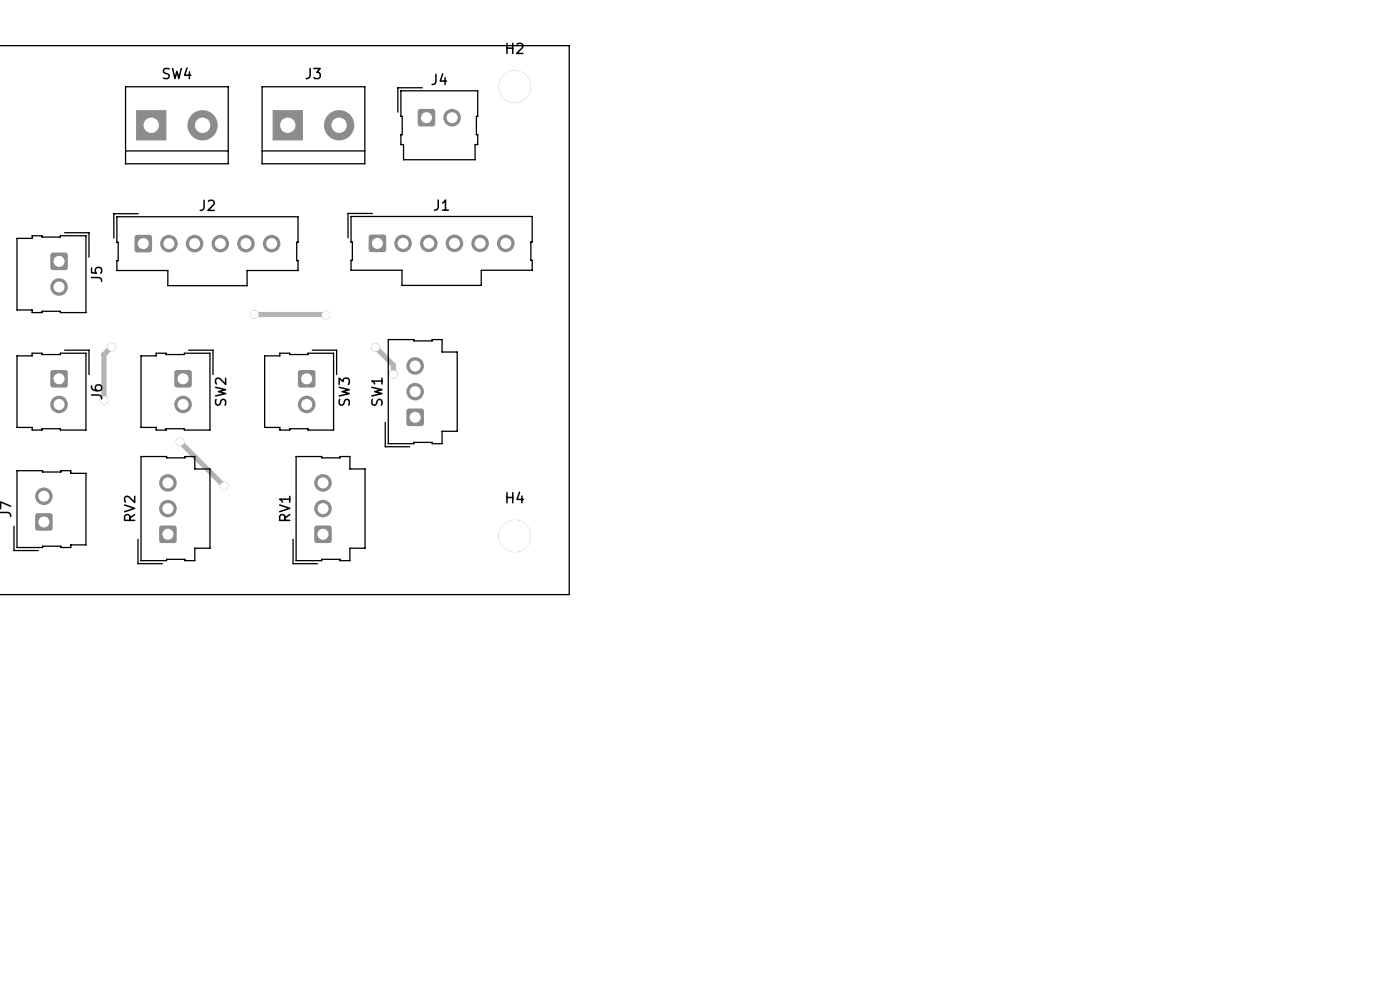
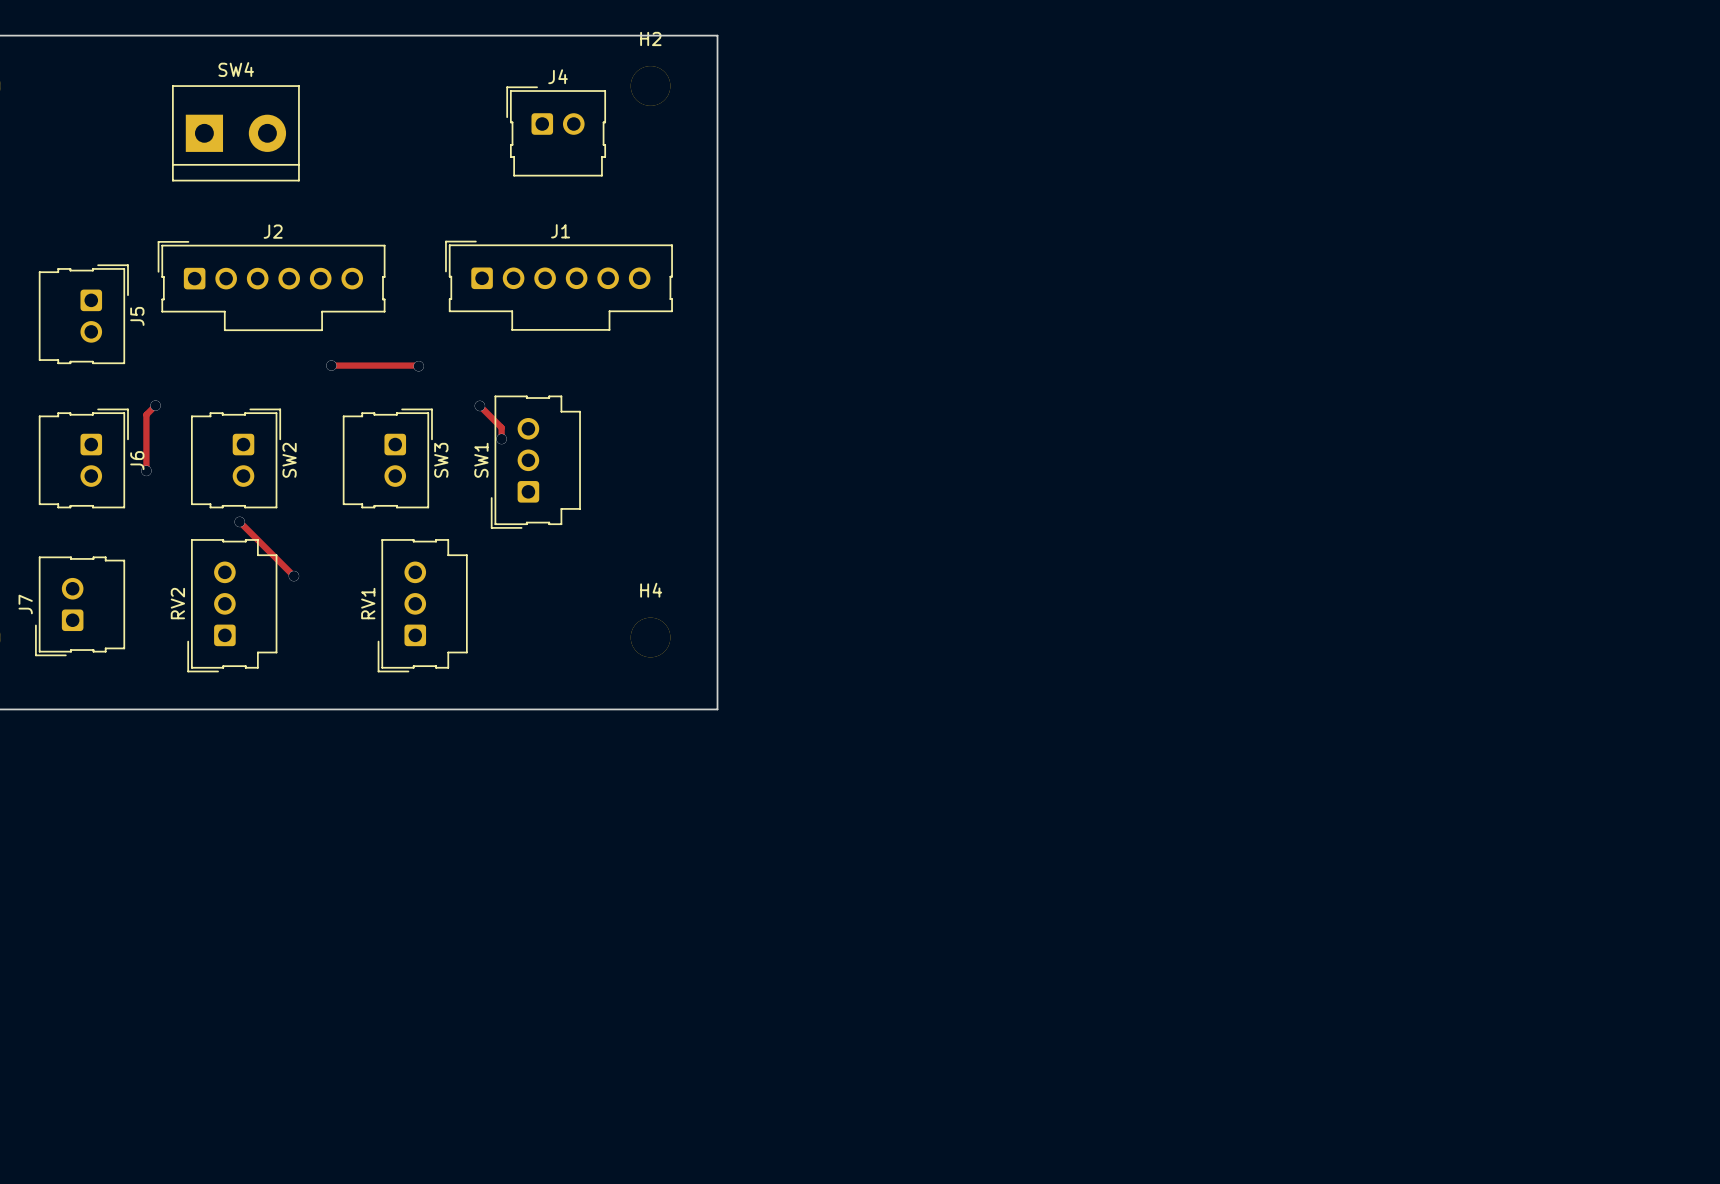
J3: (313, 125) -> none

